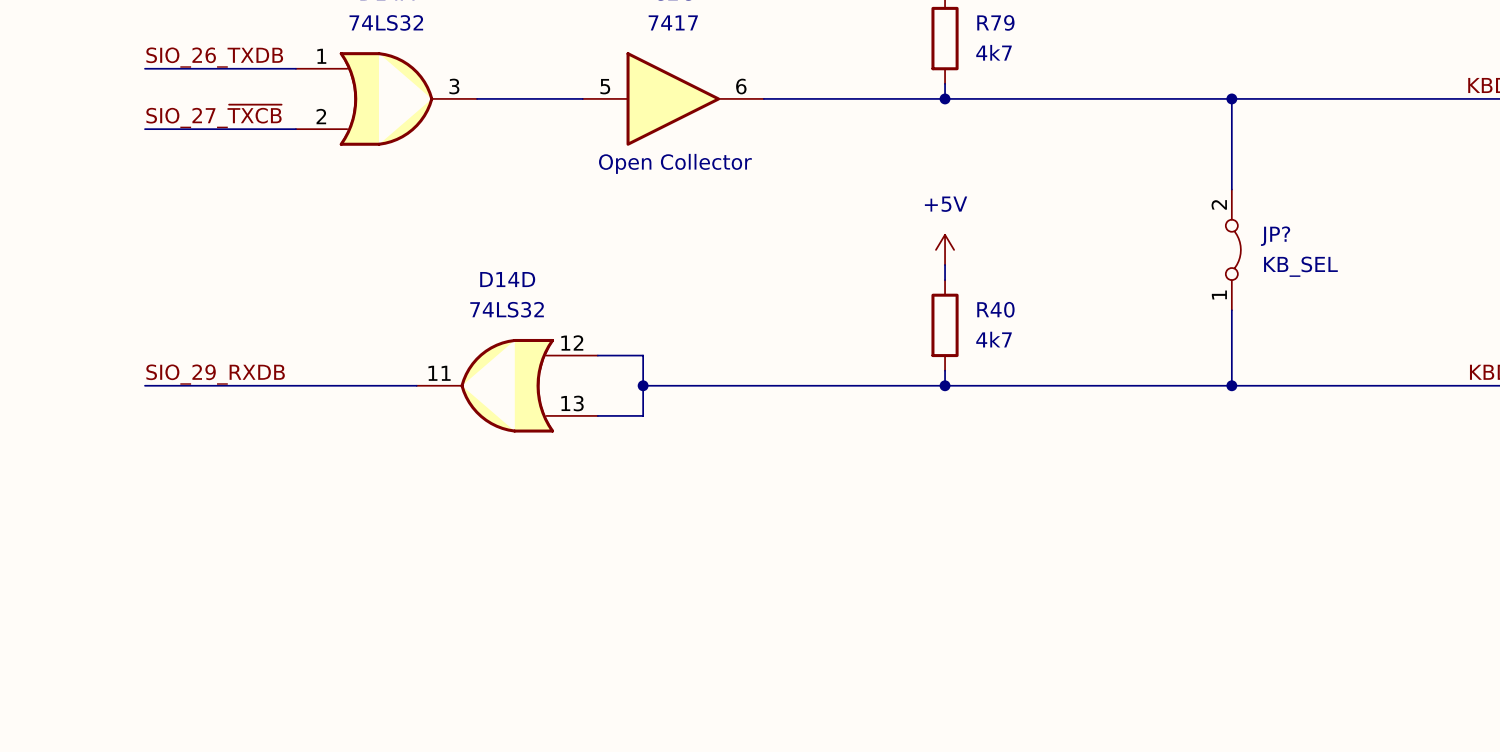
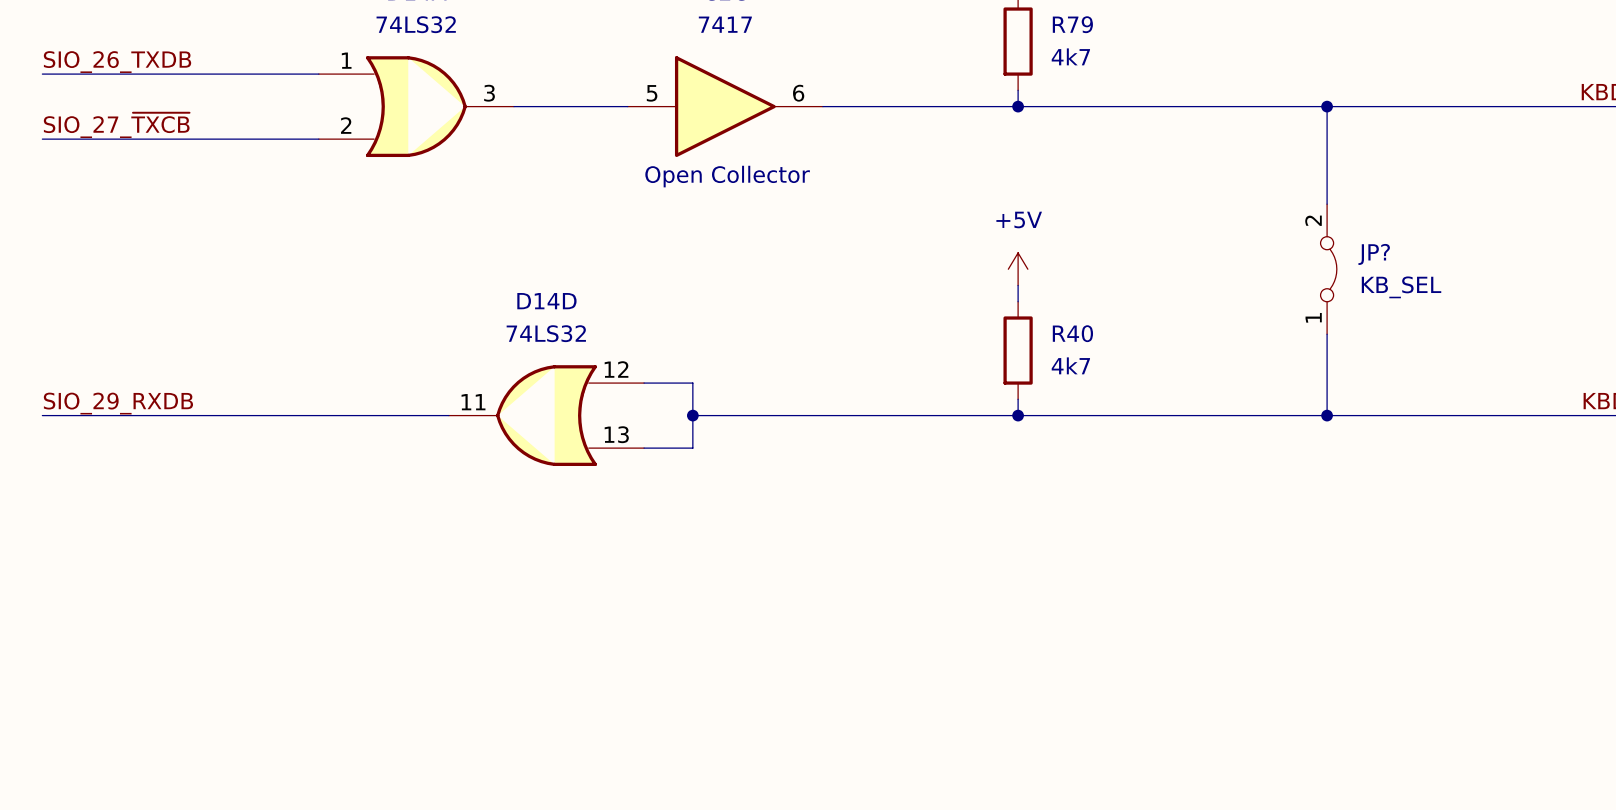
label position: SIO_26_TXDB (214, 57) -> SIO_26_TXDB (117, 62)
wire: none -> (42, 74) (156, 74)
label position: SIO_27_~{TXCB} (213, 116) -> SIO_27_~{TXCB} (116, 125)
wire: none -> (42, 139) (156, 139)
label position: SIO_29_RXDB (215, 374) -> SIO_29_RXDB (118, 403)
wire: none -> (42, 415) (156, 415)

